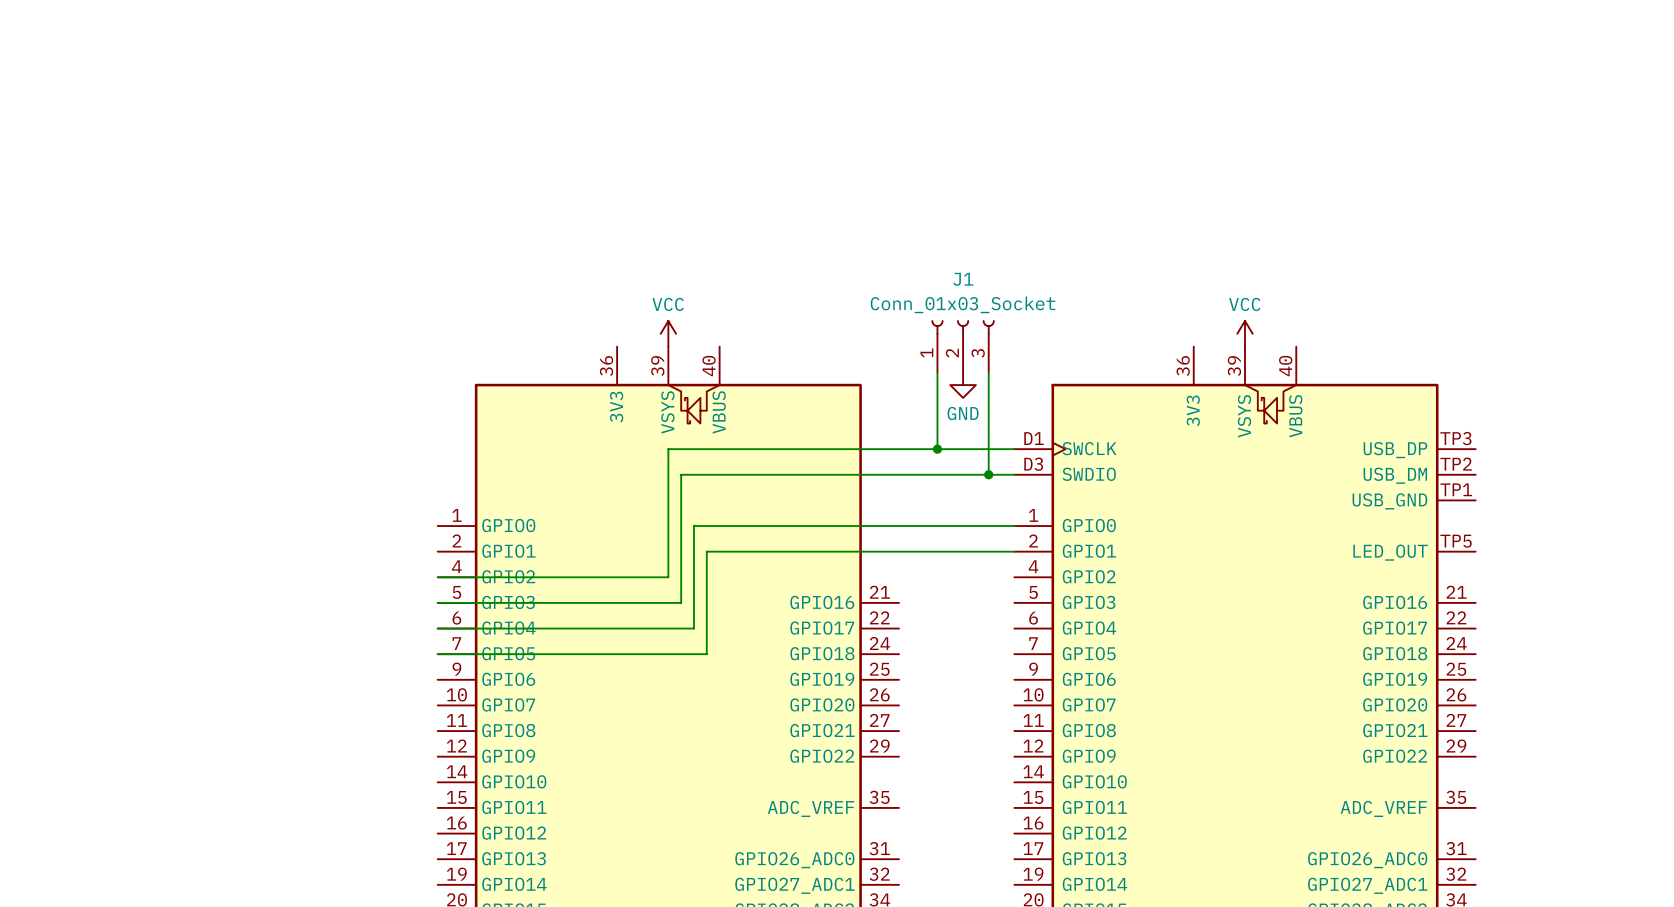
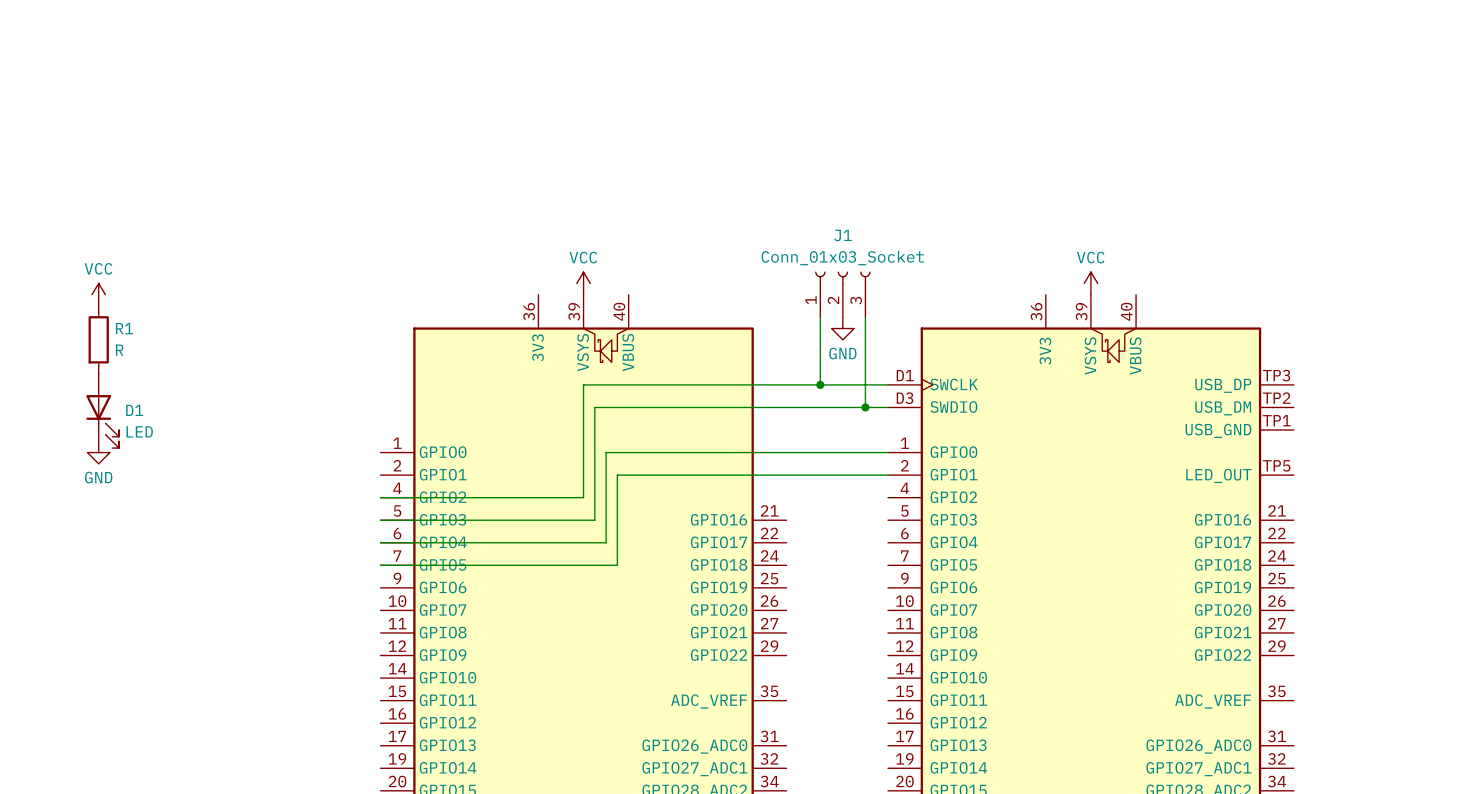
power symbol: none -> VCC (98, 294)
R1: none -> R (98, 339)
D1: none -> LED (102, 410)
power symbol: none -> GND (98, 452)

